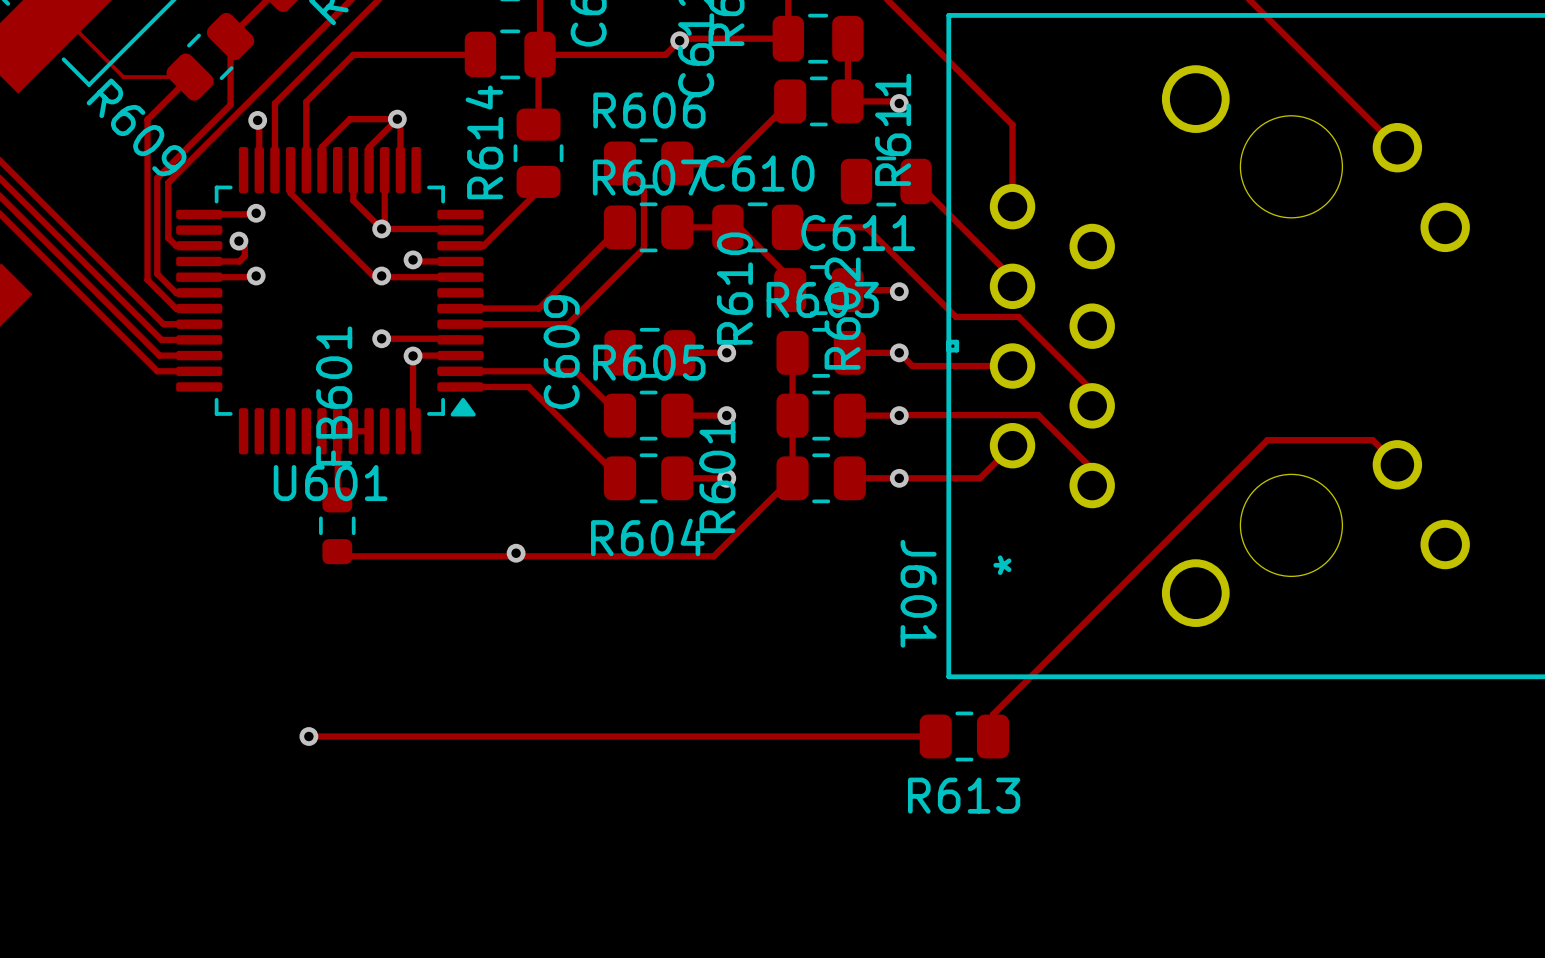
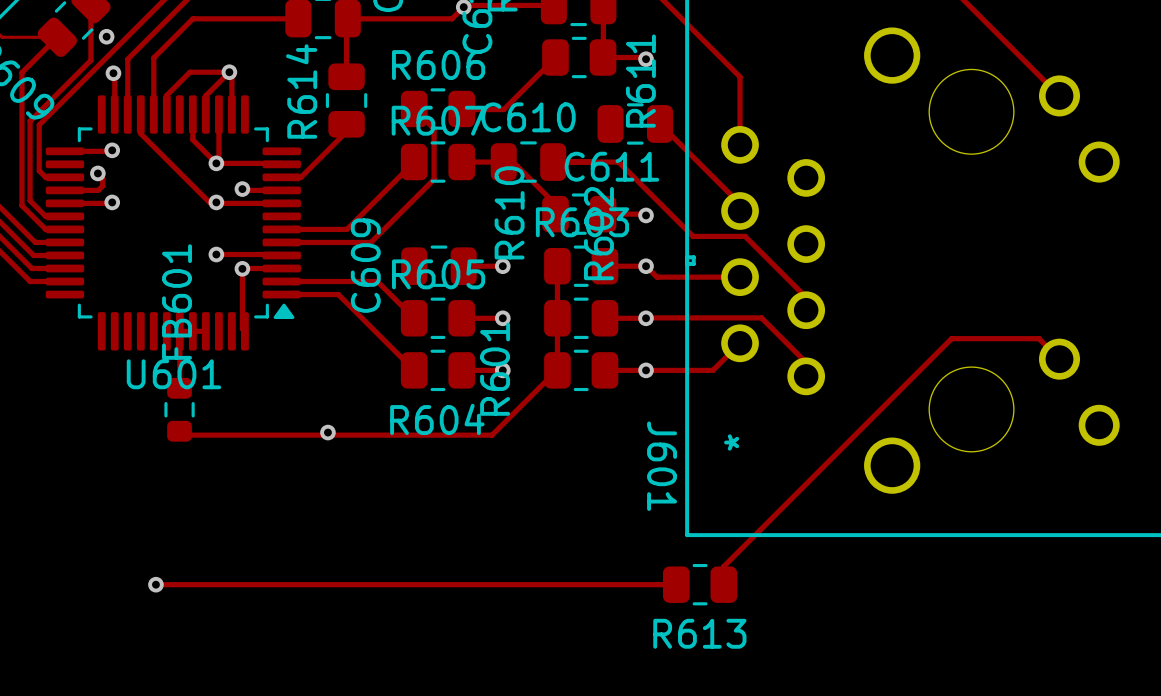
via: none -> (106, 36)

